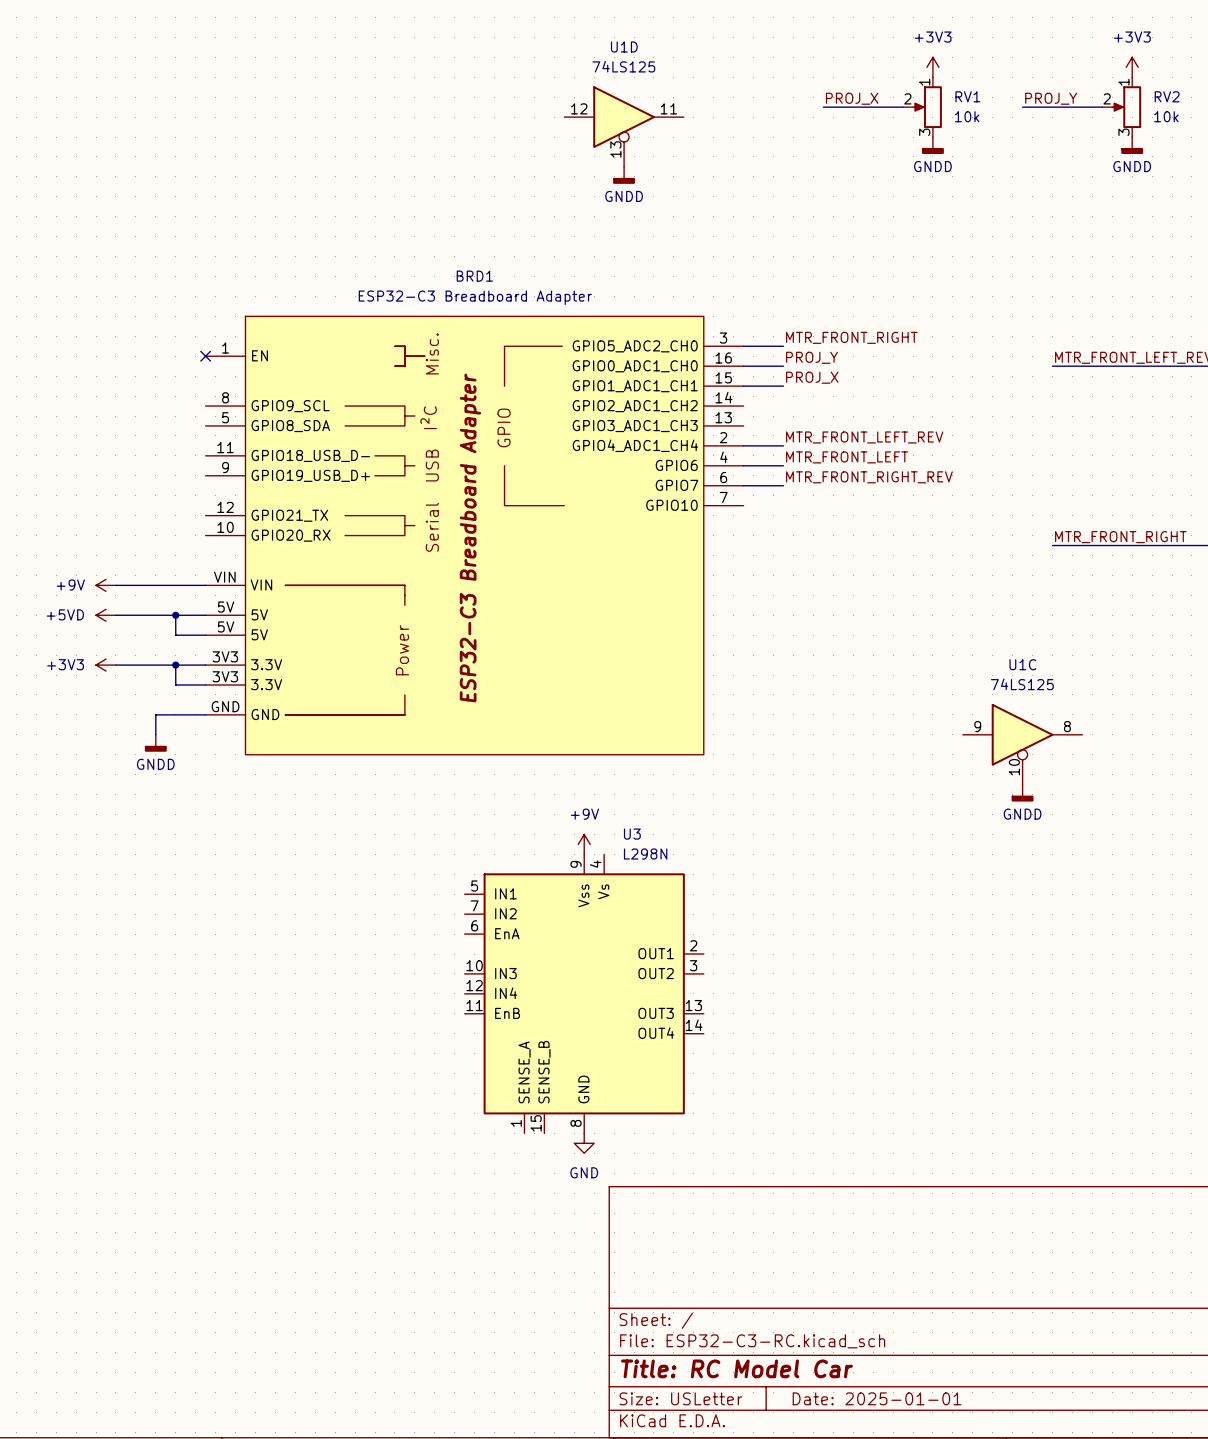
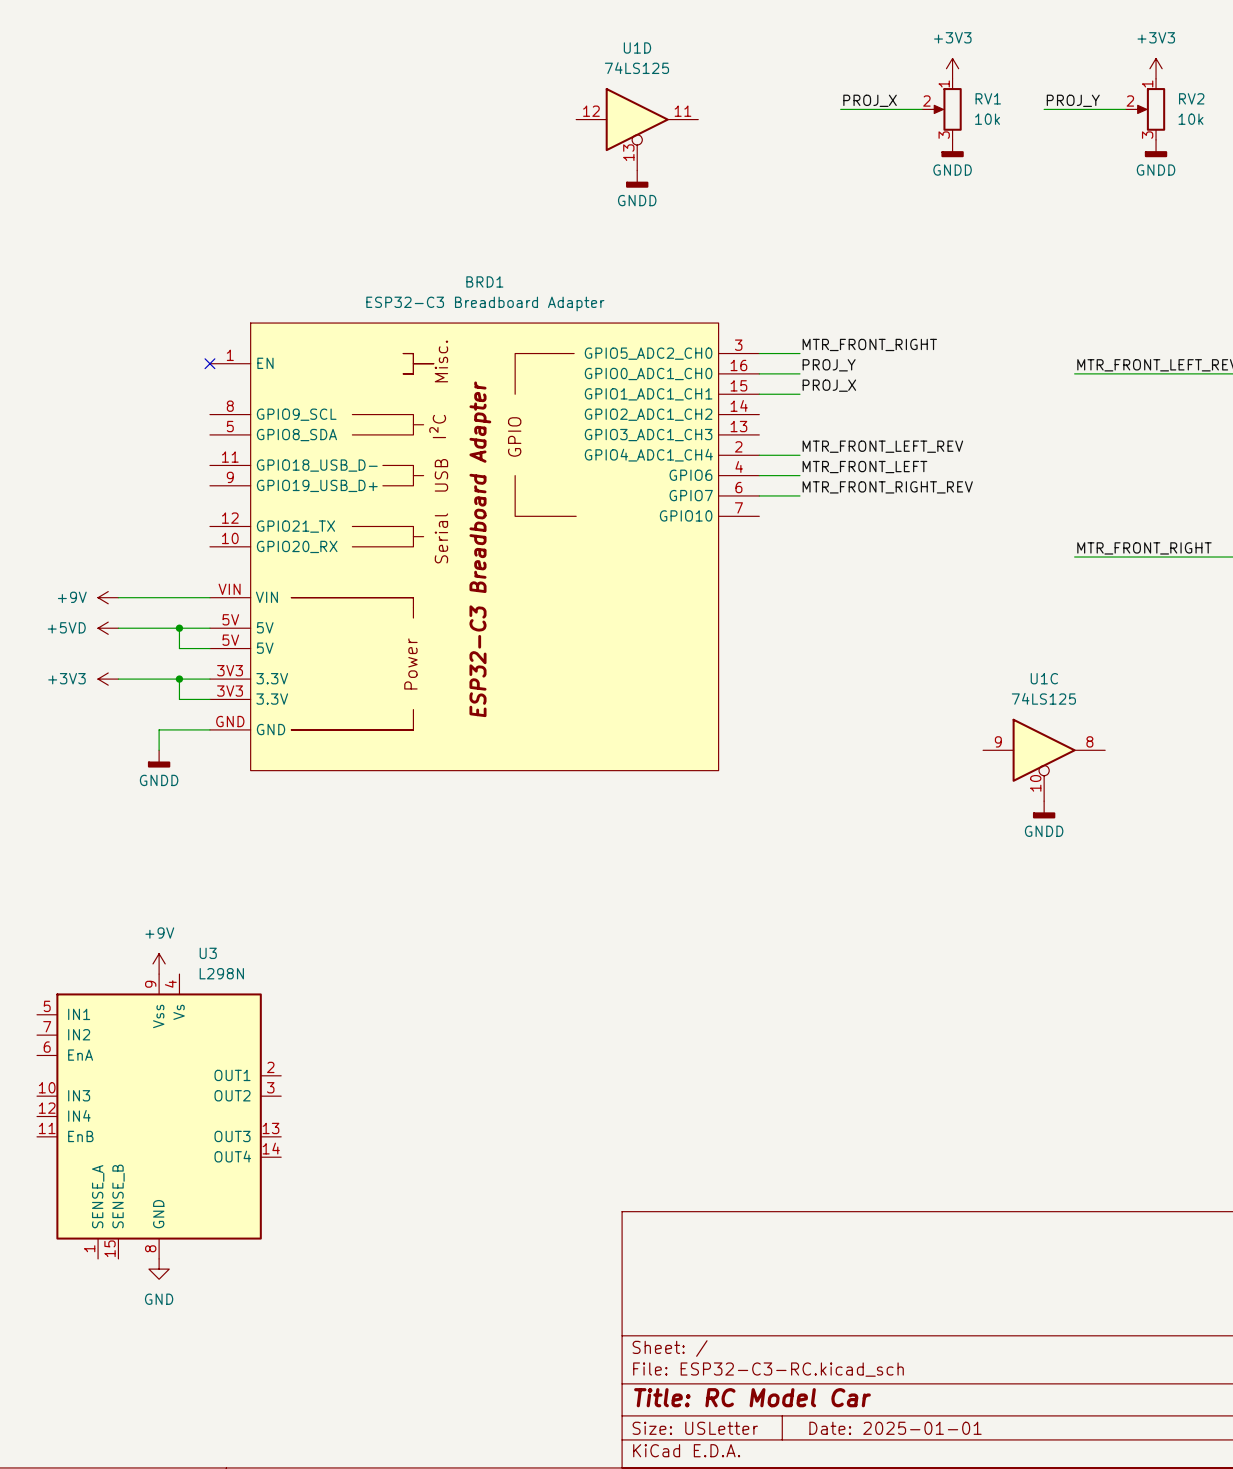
power symbol: +9V (584, 844) -> none
power symbol: none -> +9V (159, 963)
U3 position: (584, 993) -> (159, 1116)
power symbol: GND (584, 1143) -> none
power symbol: none -> GND (159, 1269)

